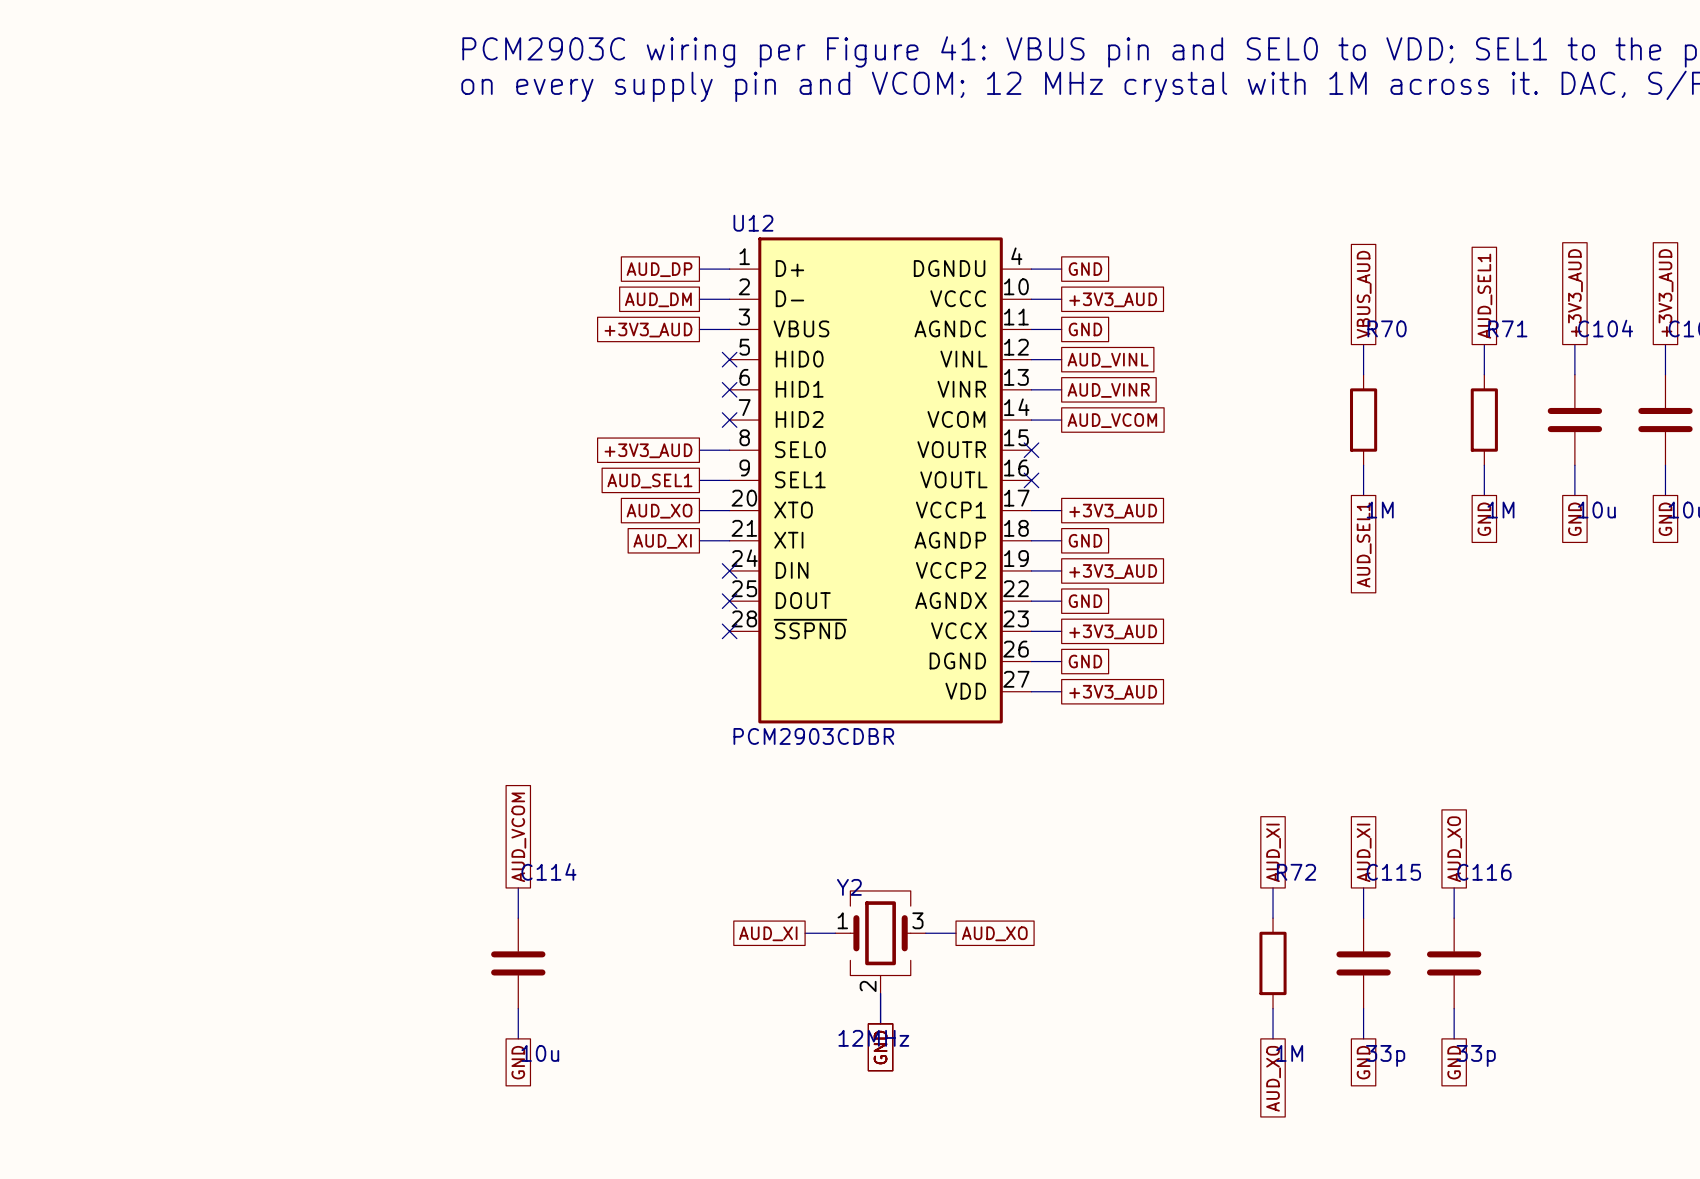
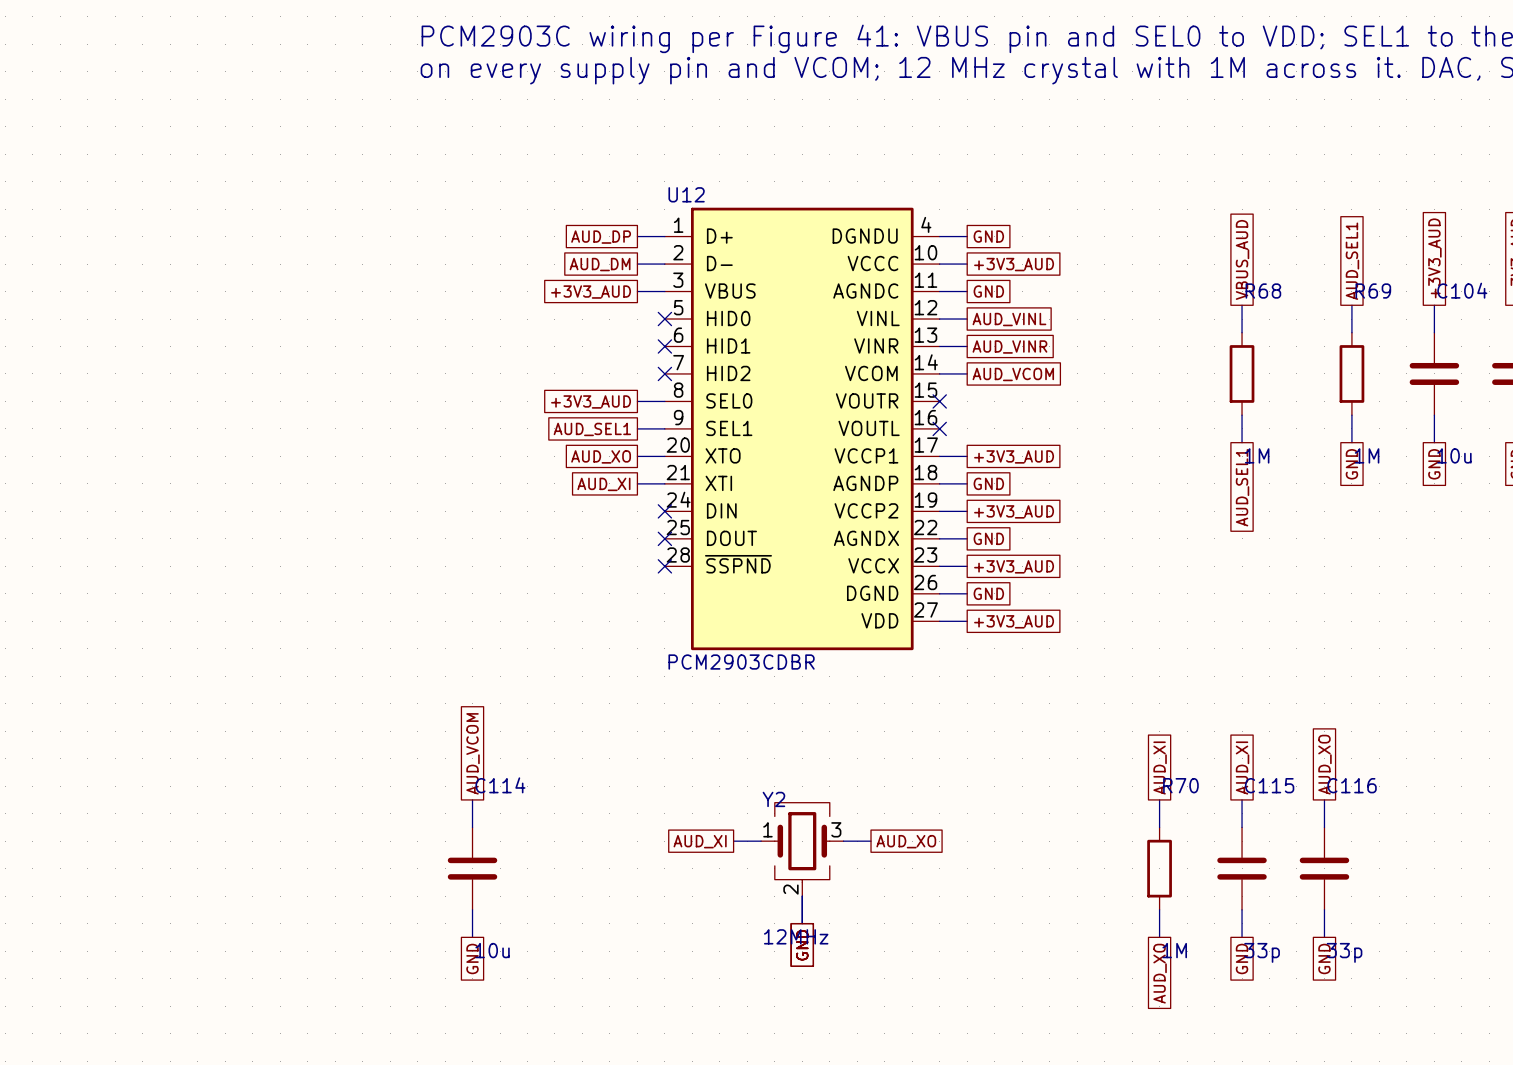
R70 name: R70 (1387, 328) -> R68 (1263, 291)
R71 name: R71 (1507, 328) -> R69 (1373, 291)
R72 name: R72 (1296, 872) -> R70 (1180, 785)

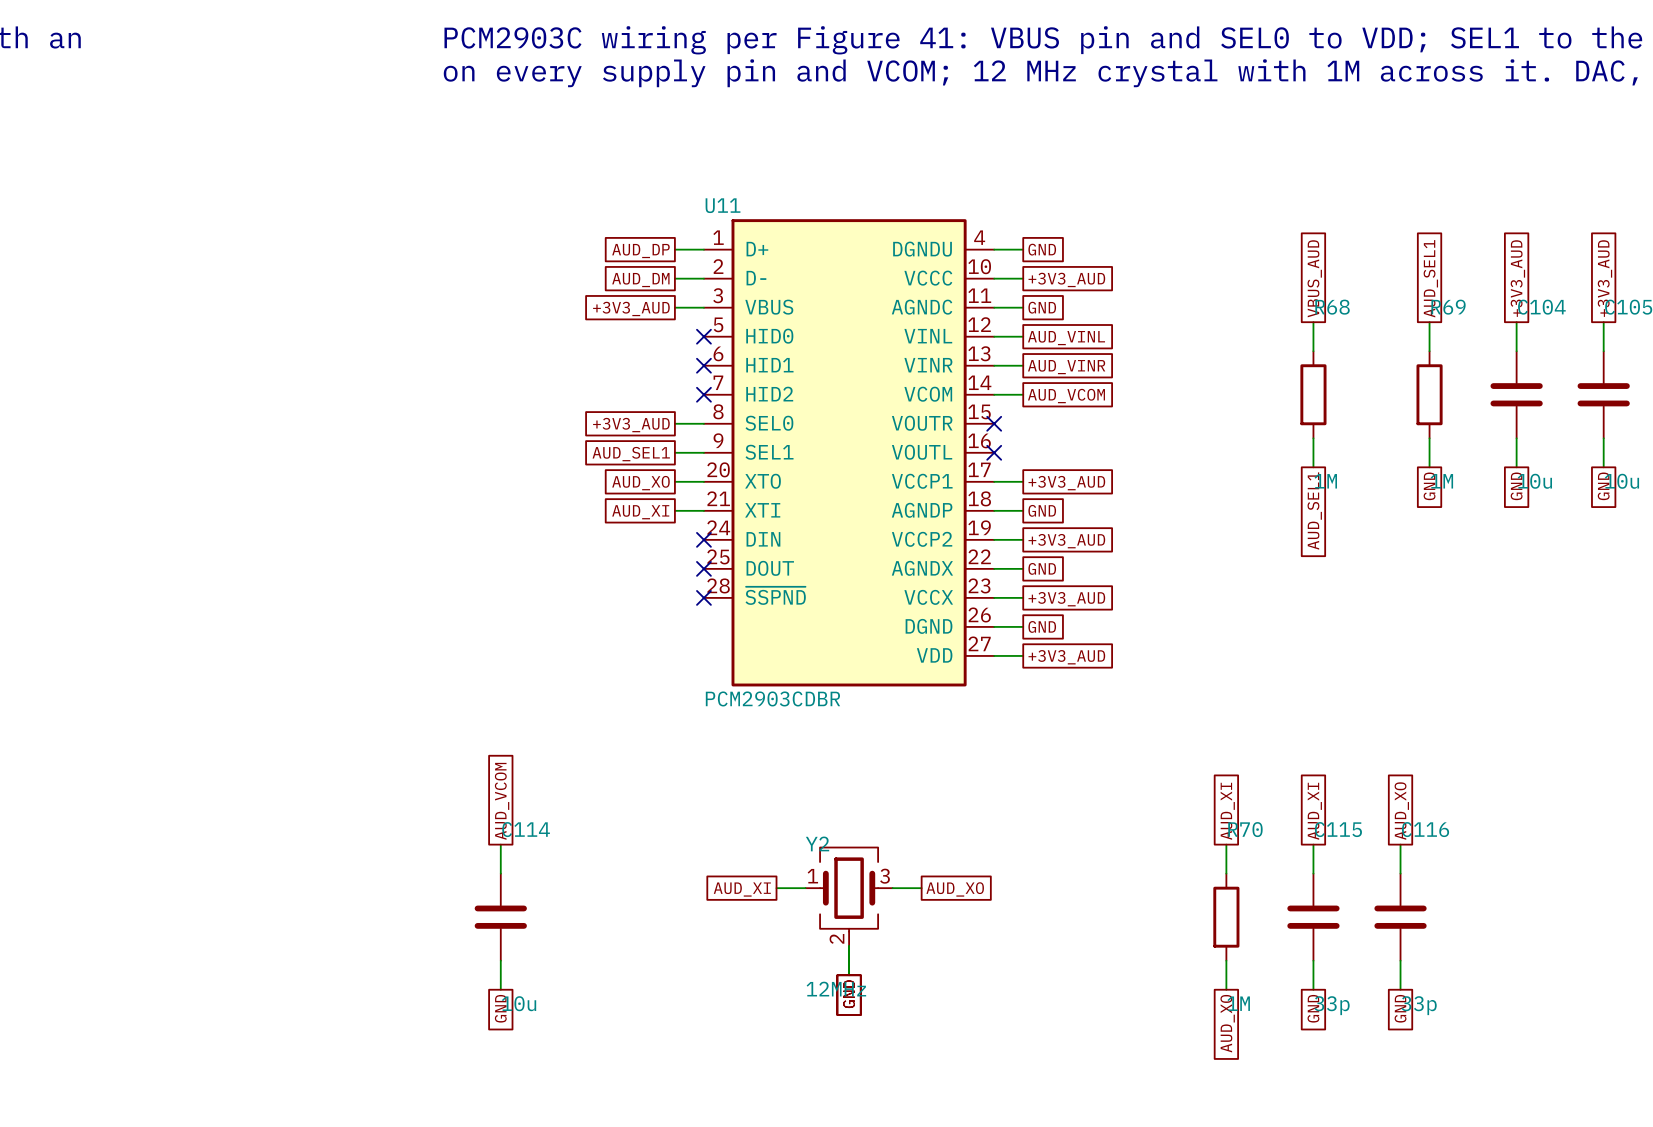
U12 name: U12 (686, 194) -> U11 (723, 205)

